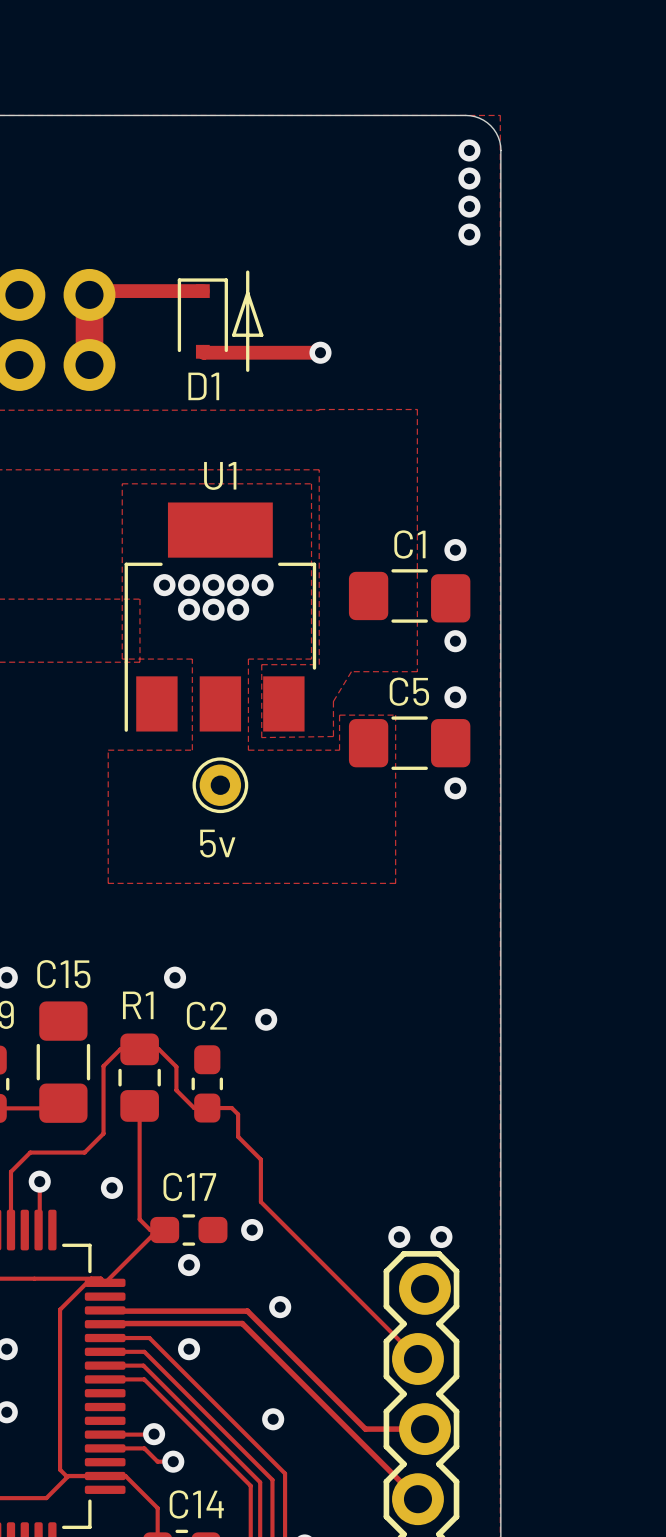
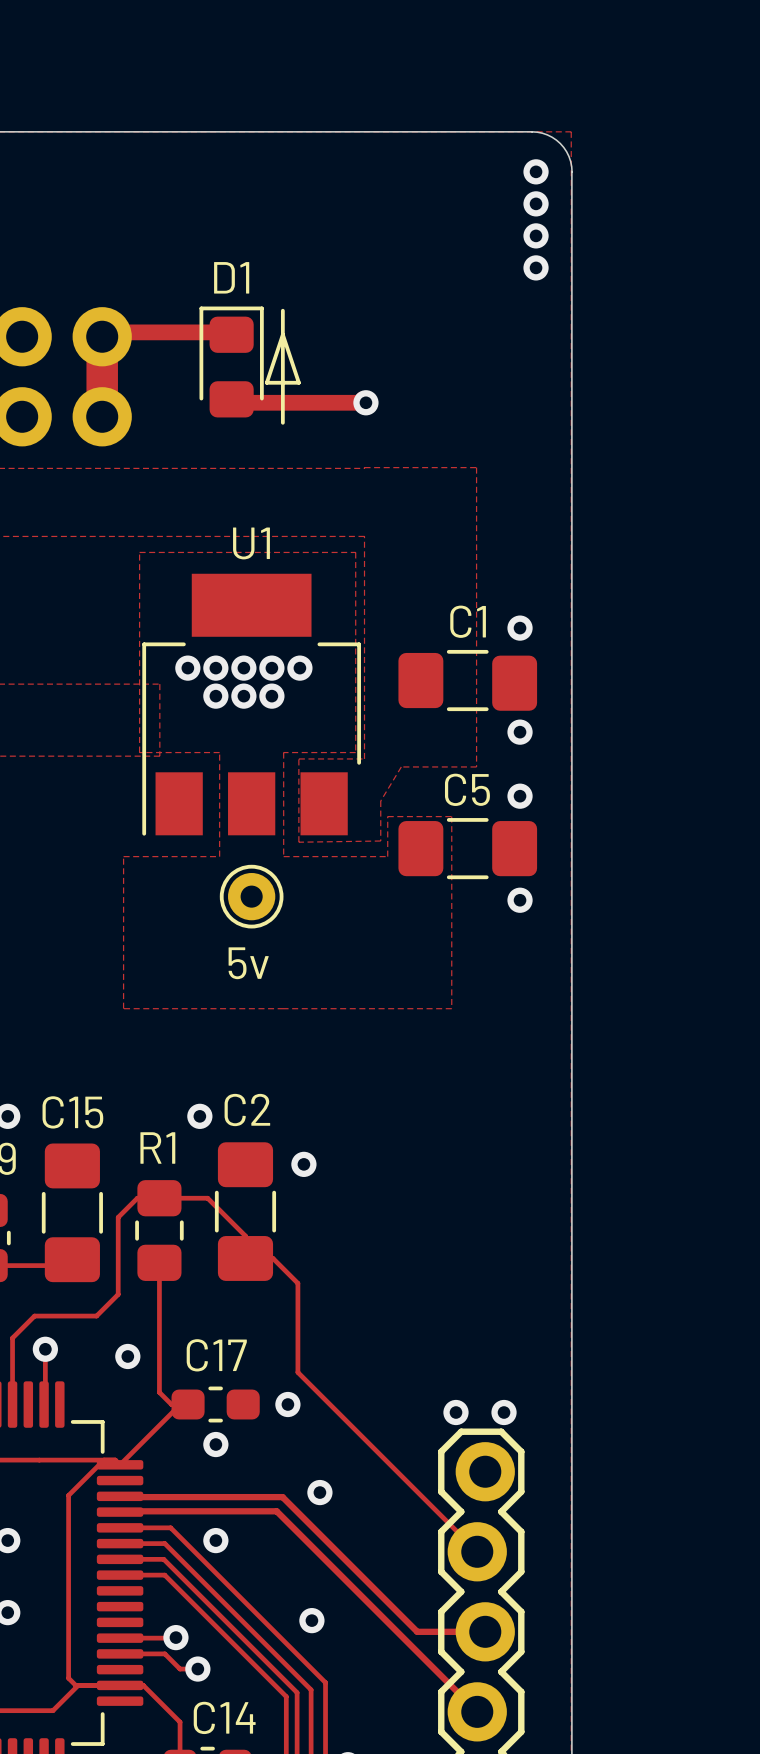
D1 footprint: [177, 278, 228, 359] -> [199, 306, 264, 418]
D1 name position: D1 (203, 386) -> D1 (231, 277)
C2 footprint: [191, 1045, 224, 1123] -> [214, 1142, 277, 1281]
track: (158, 1049) (176, 1066) (176, 1090) (194, 1108) (231, 1108) (238, 1114) (238, 1136) (260, 1159) -> (181, 1198) (207, 1198) (245, 1236) (245, 1258) (273, 1258) (297, 1283) (297, 1324)

